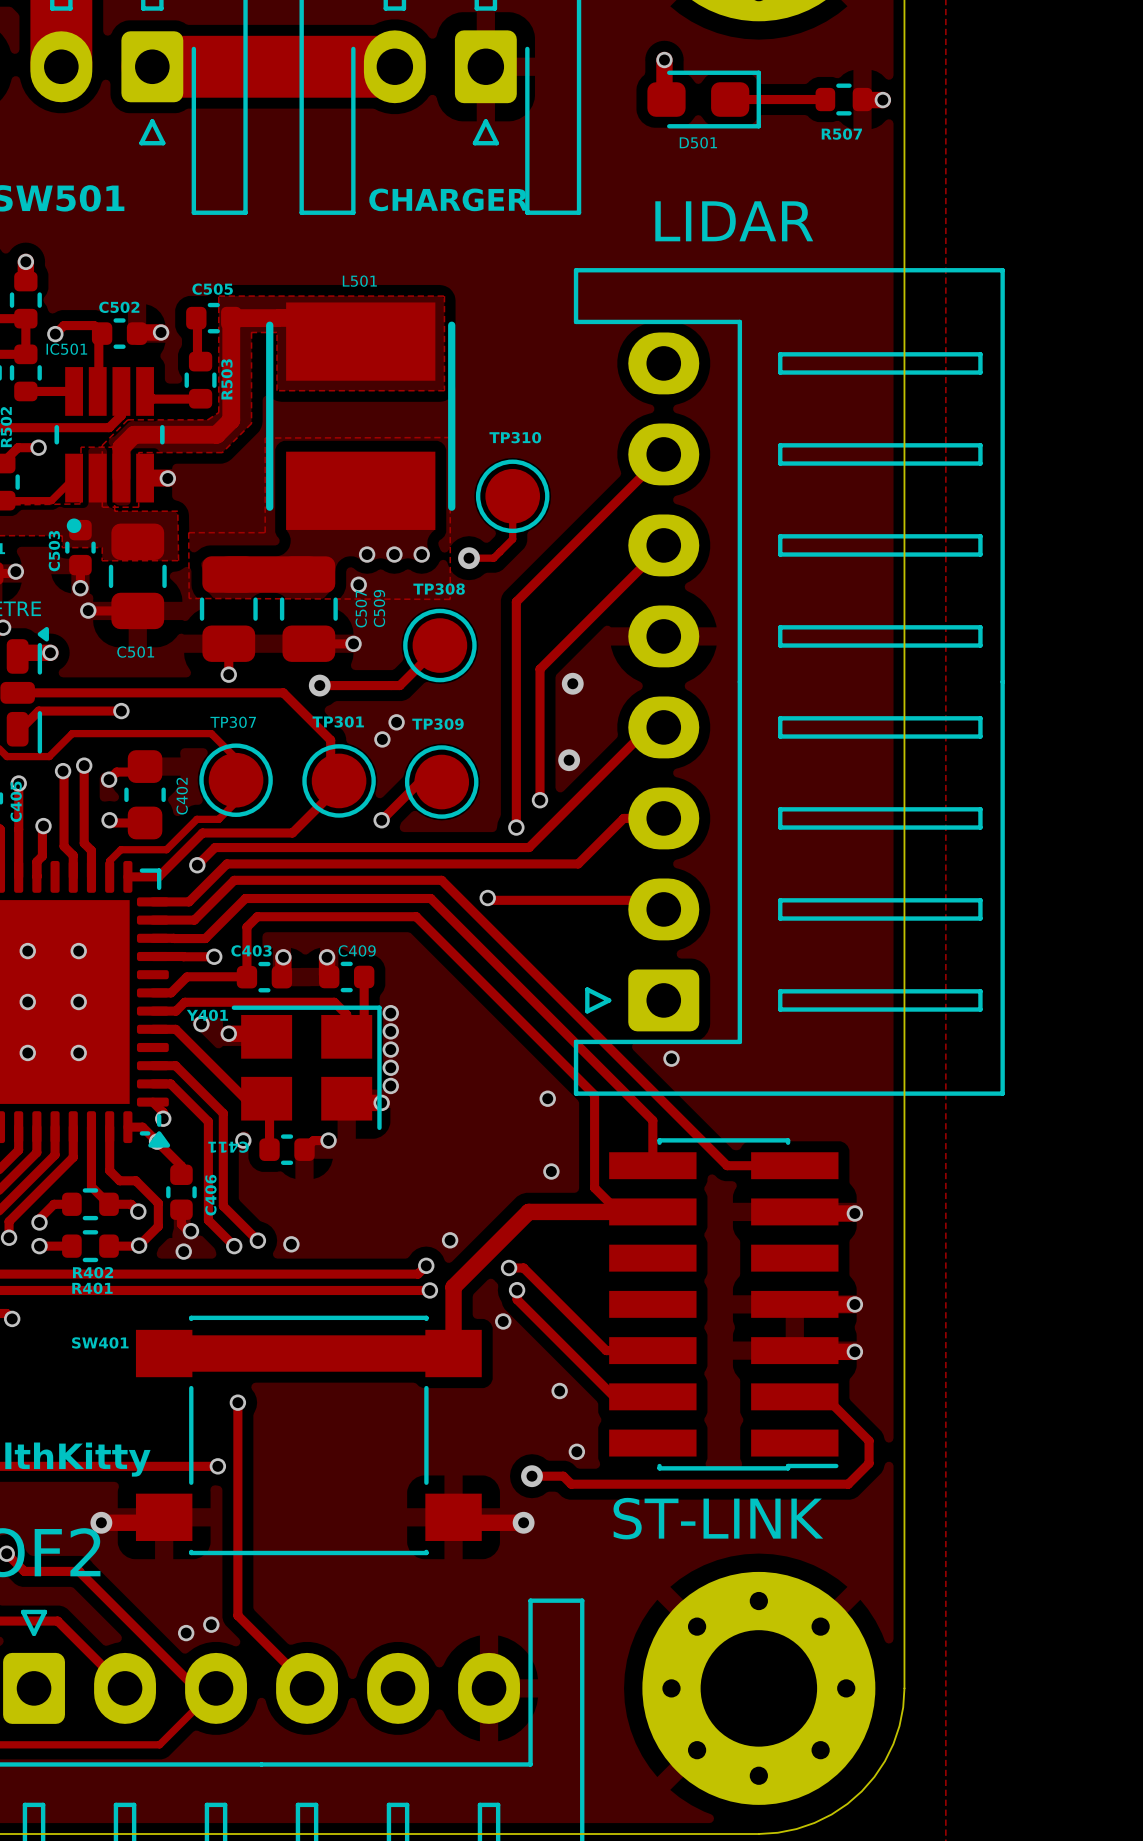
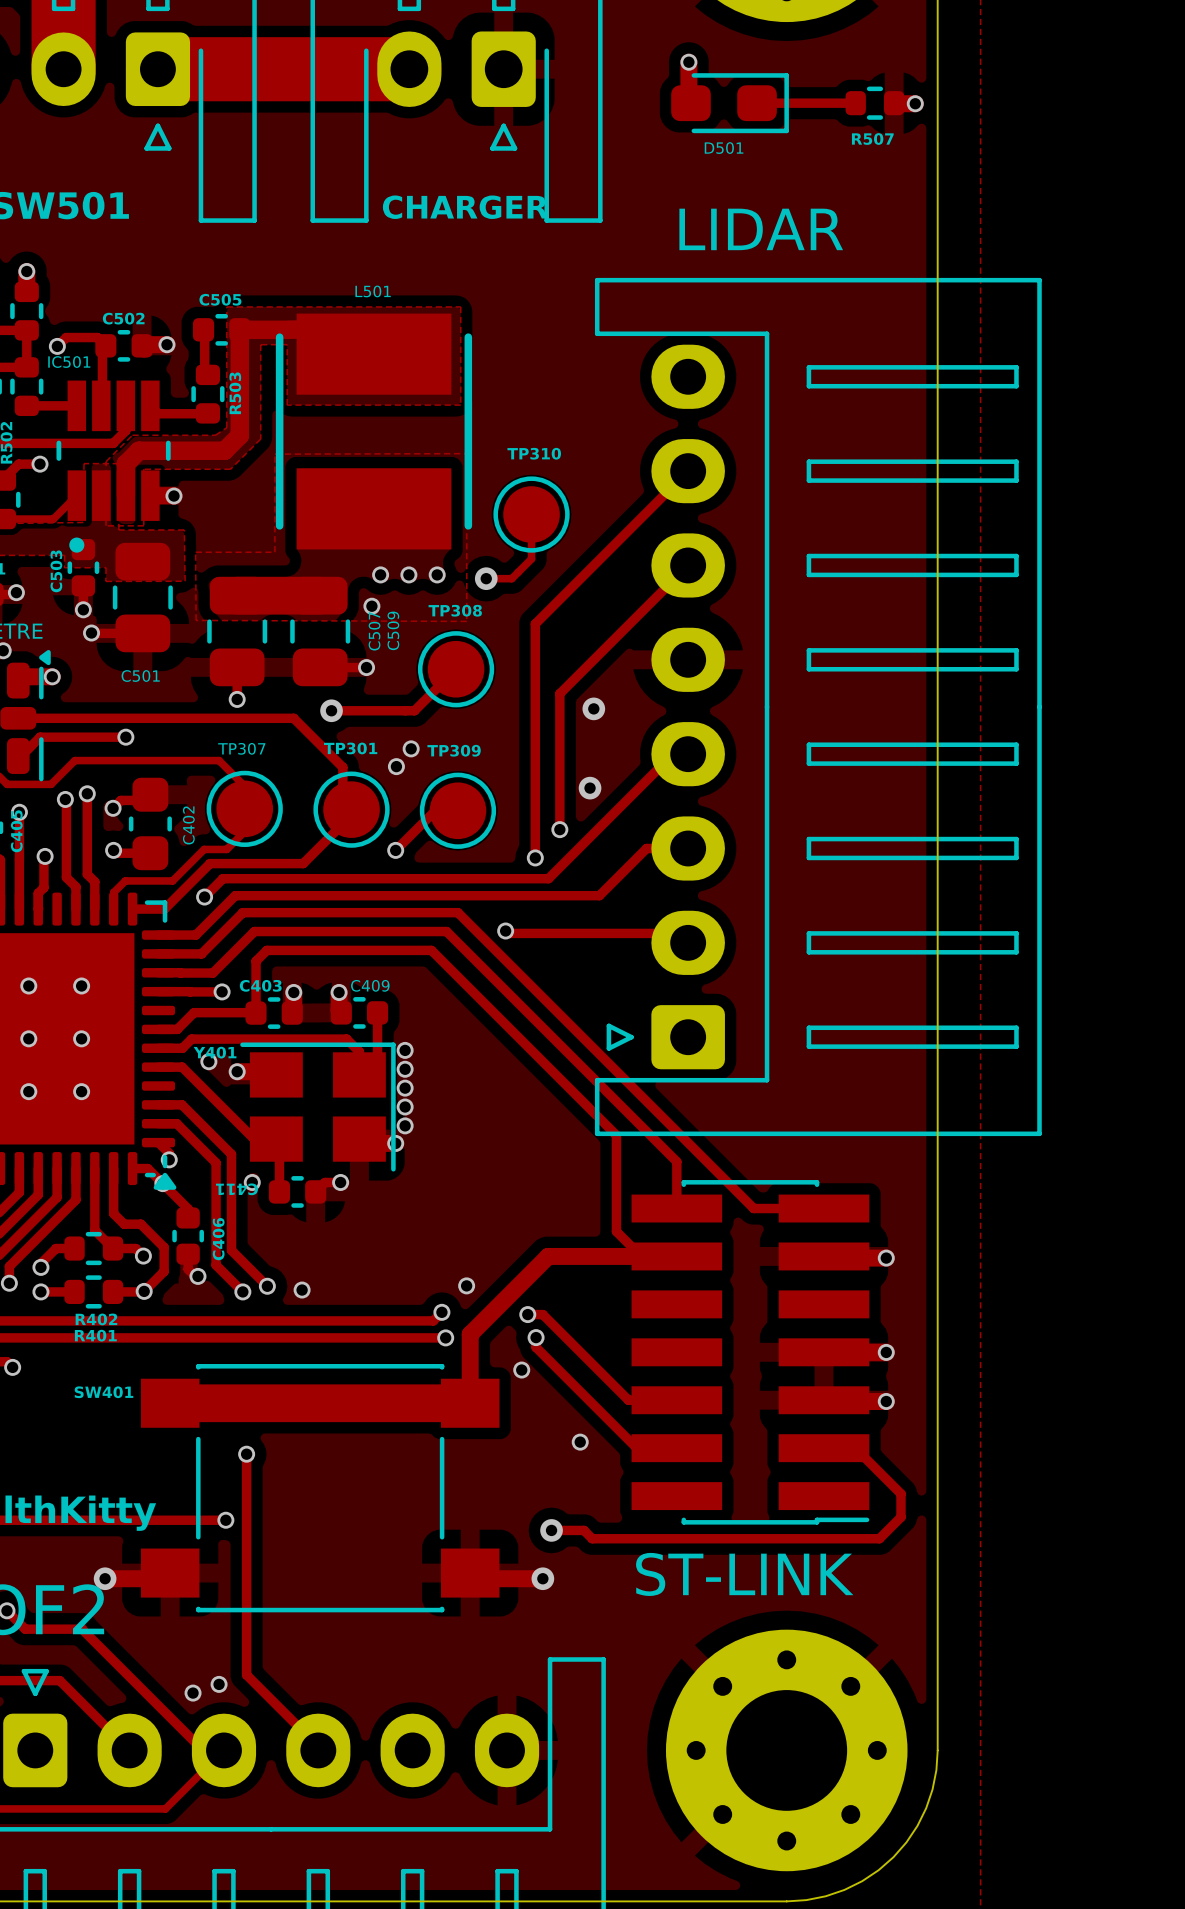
via: (671, 1058) -> none
via: (547, 1098) -> none
via: (551, 1171) -> none
via: (183, 1251) -> none
via: (576, 1451) -> none

